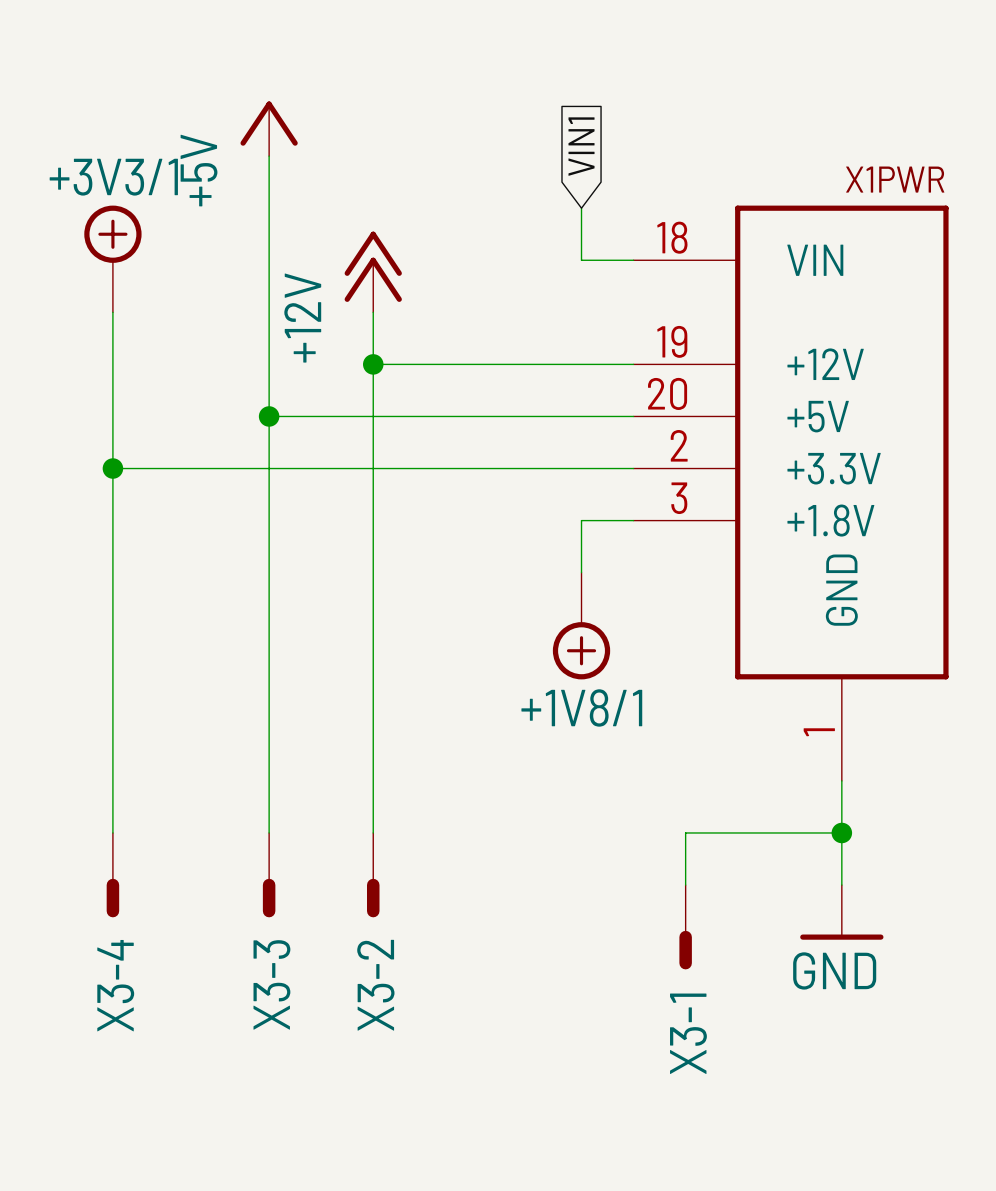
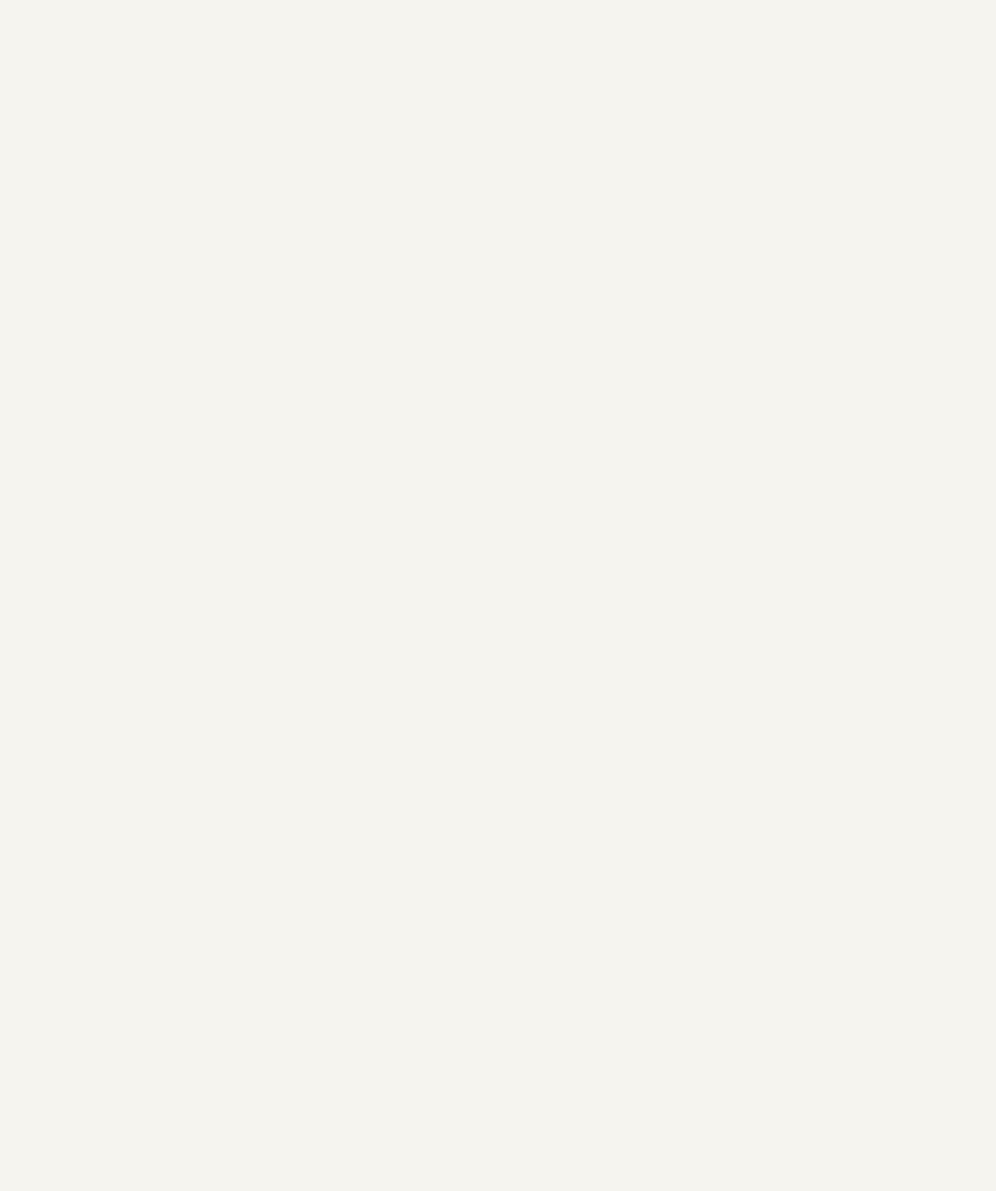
power symbol: +5V (269, 128) -> none
global label: VIN1 (581, 146) -> none
wire: (269, 156) (269, 832) -> none
wire: (581, 208) (581, 260) (633, 260) -> none
power symbol: +3V3/1 (112, 258) -> none
power symbol: +12V (373, 271) -> none
wire: (112, 312) (112, 832) -> none
wire: (373, 312) (373, 832) -> none
wire: (373, 364) (633, 364) -> none
junction: (373, 364) -> none
wire: (269, 416) (633, 416) -> none
junction: (269, 416) -> none
wire: (112, 468) (633, 468) -> none
junction: (112, 468) -> none
X1PWR: (791, 493) -> none
wire: (633, 520) (581, 520) (581, 572) -> none
power symbol: +1V8/1 (581, 626) -> none
wire: (841, 780) (841, 885) -> none
wire: (841, 832) (685, 832) (685, 885) -> none
junction: (841, 832) -> none
X3-4: (112, 875) -> none
X3-3: (269, 875) -> none
X3-2: (373, 875) -> none
power symbol: GND (841, 912) -> none
X3-1: (685, 927) -> none

